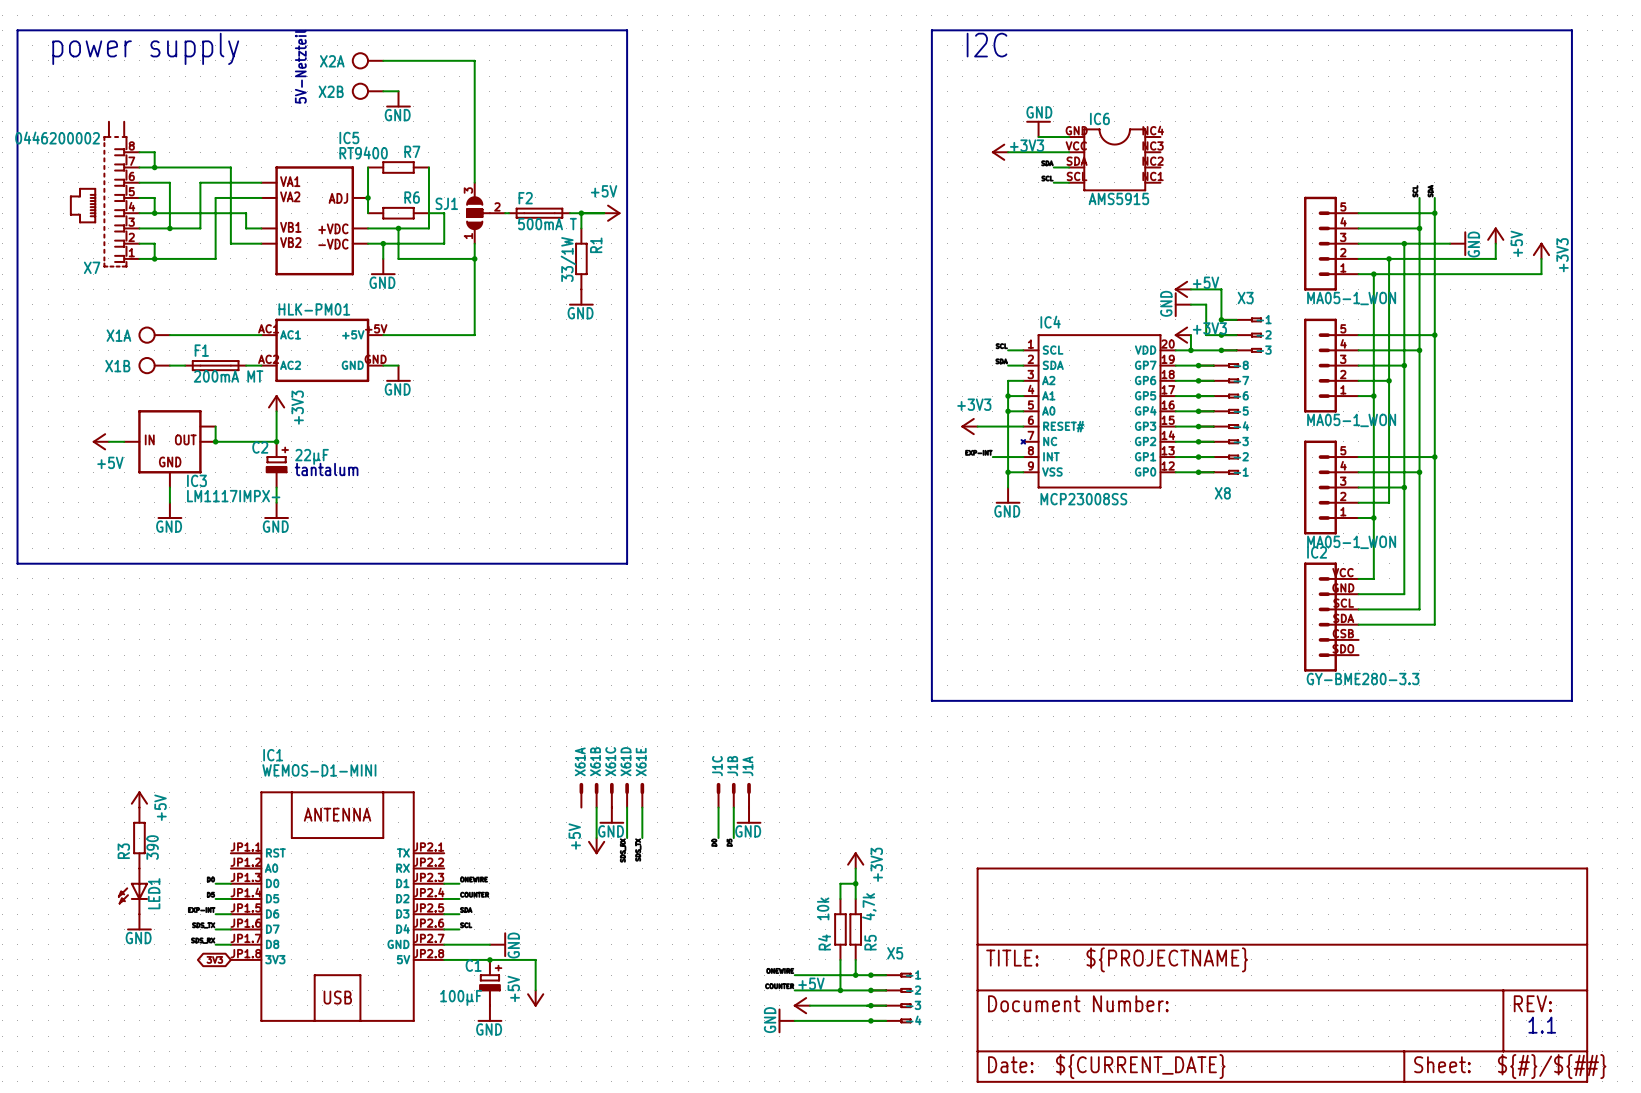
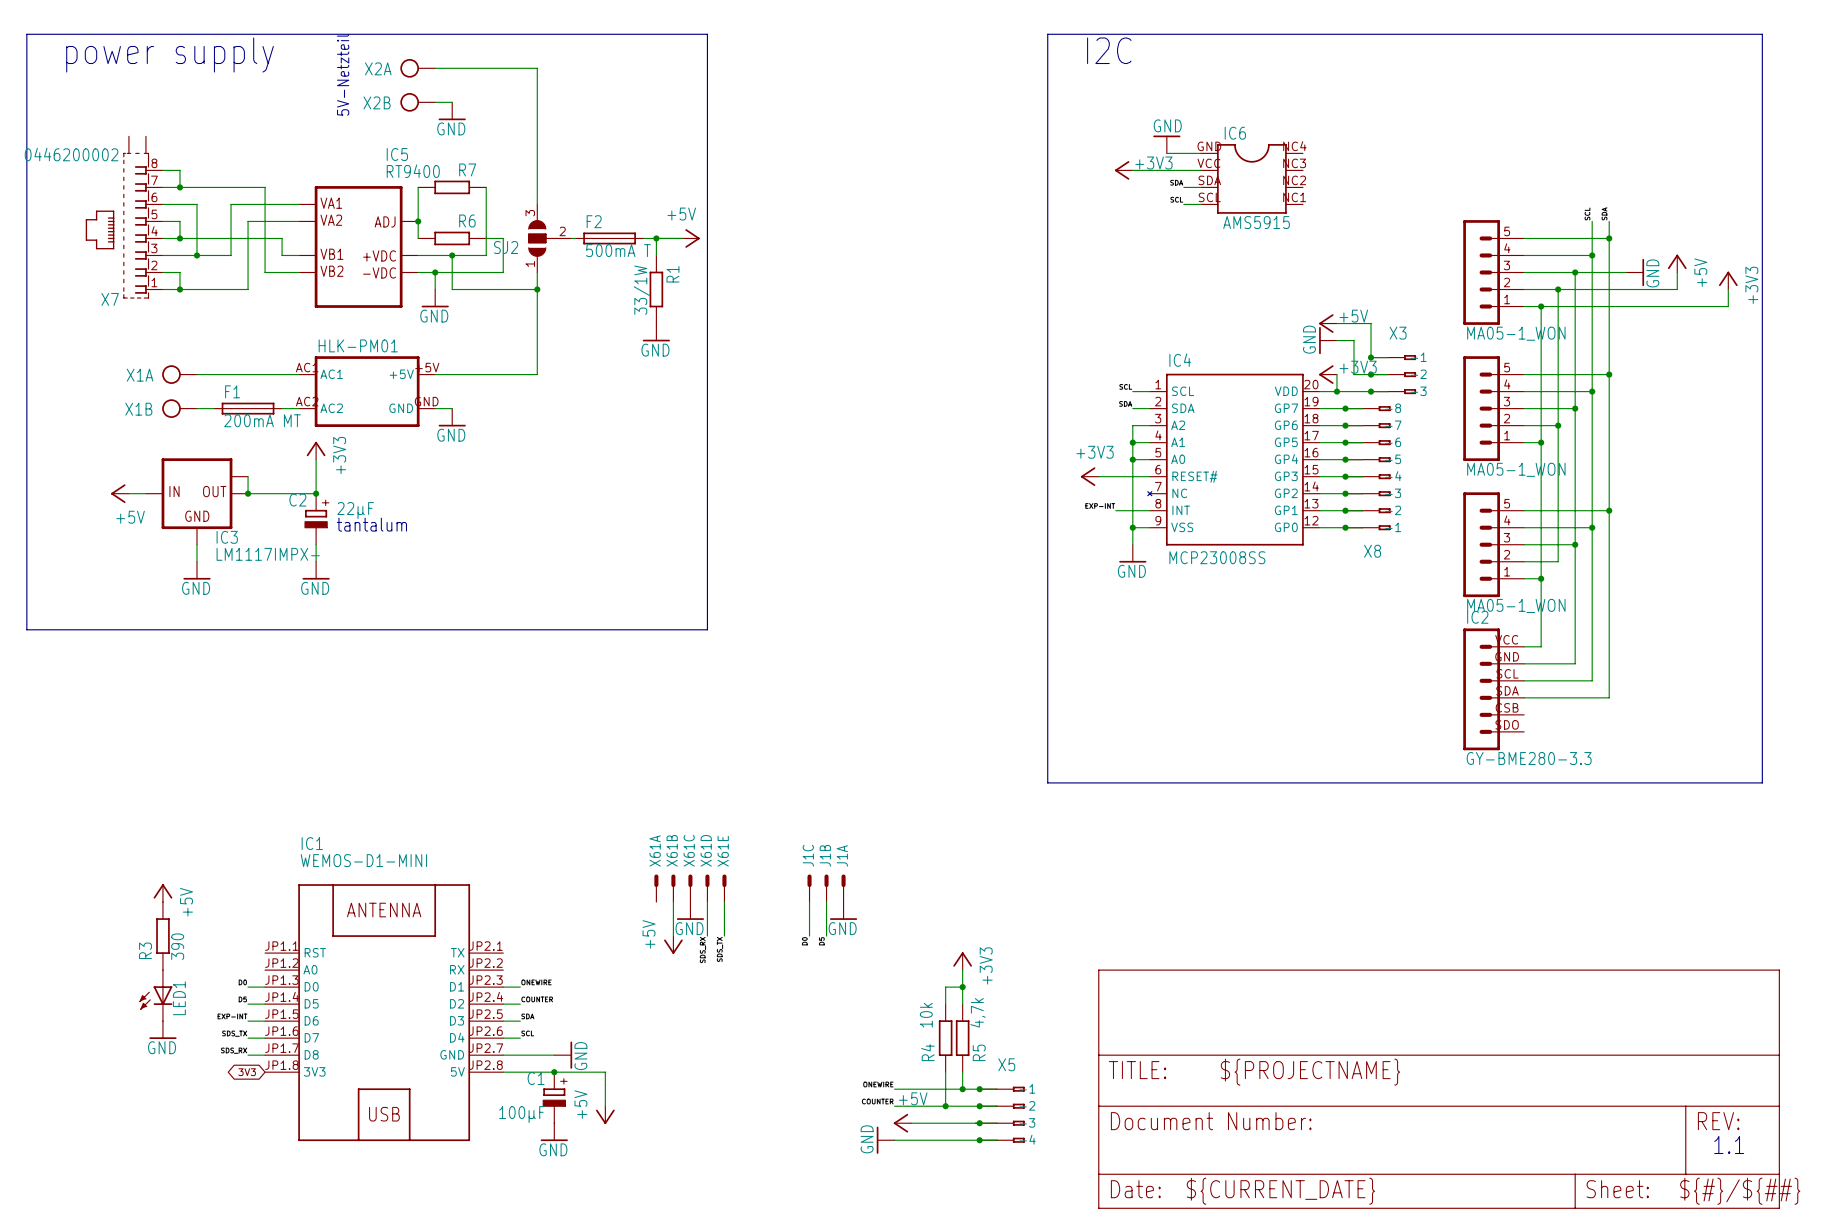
SJ1 name: SJ1 (446, 203) -> SJ2 (506, 247)

